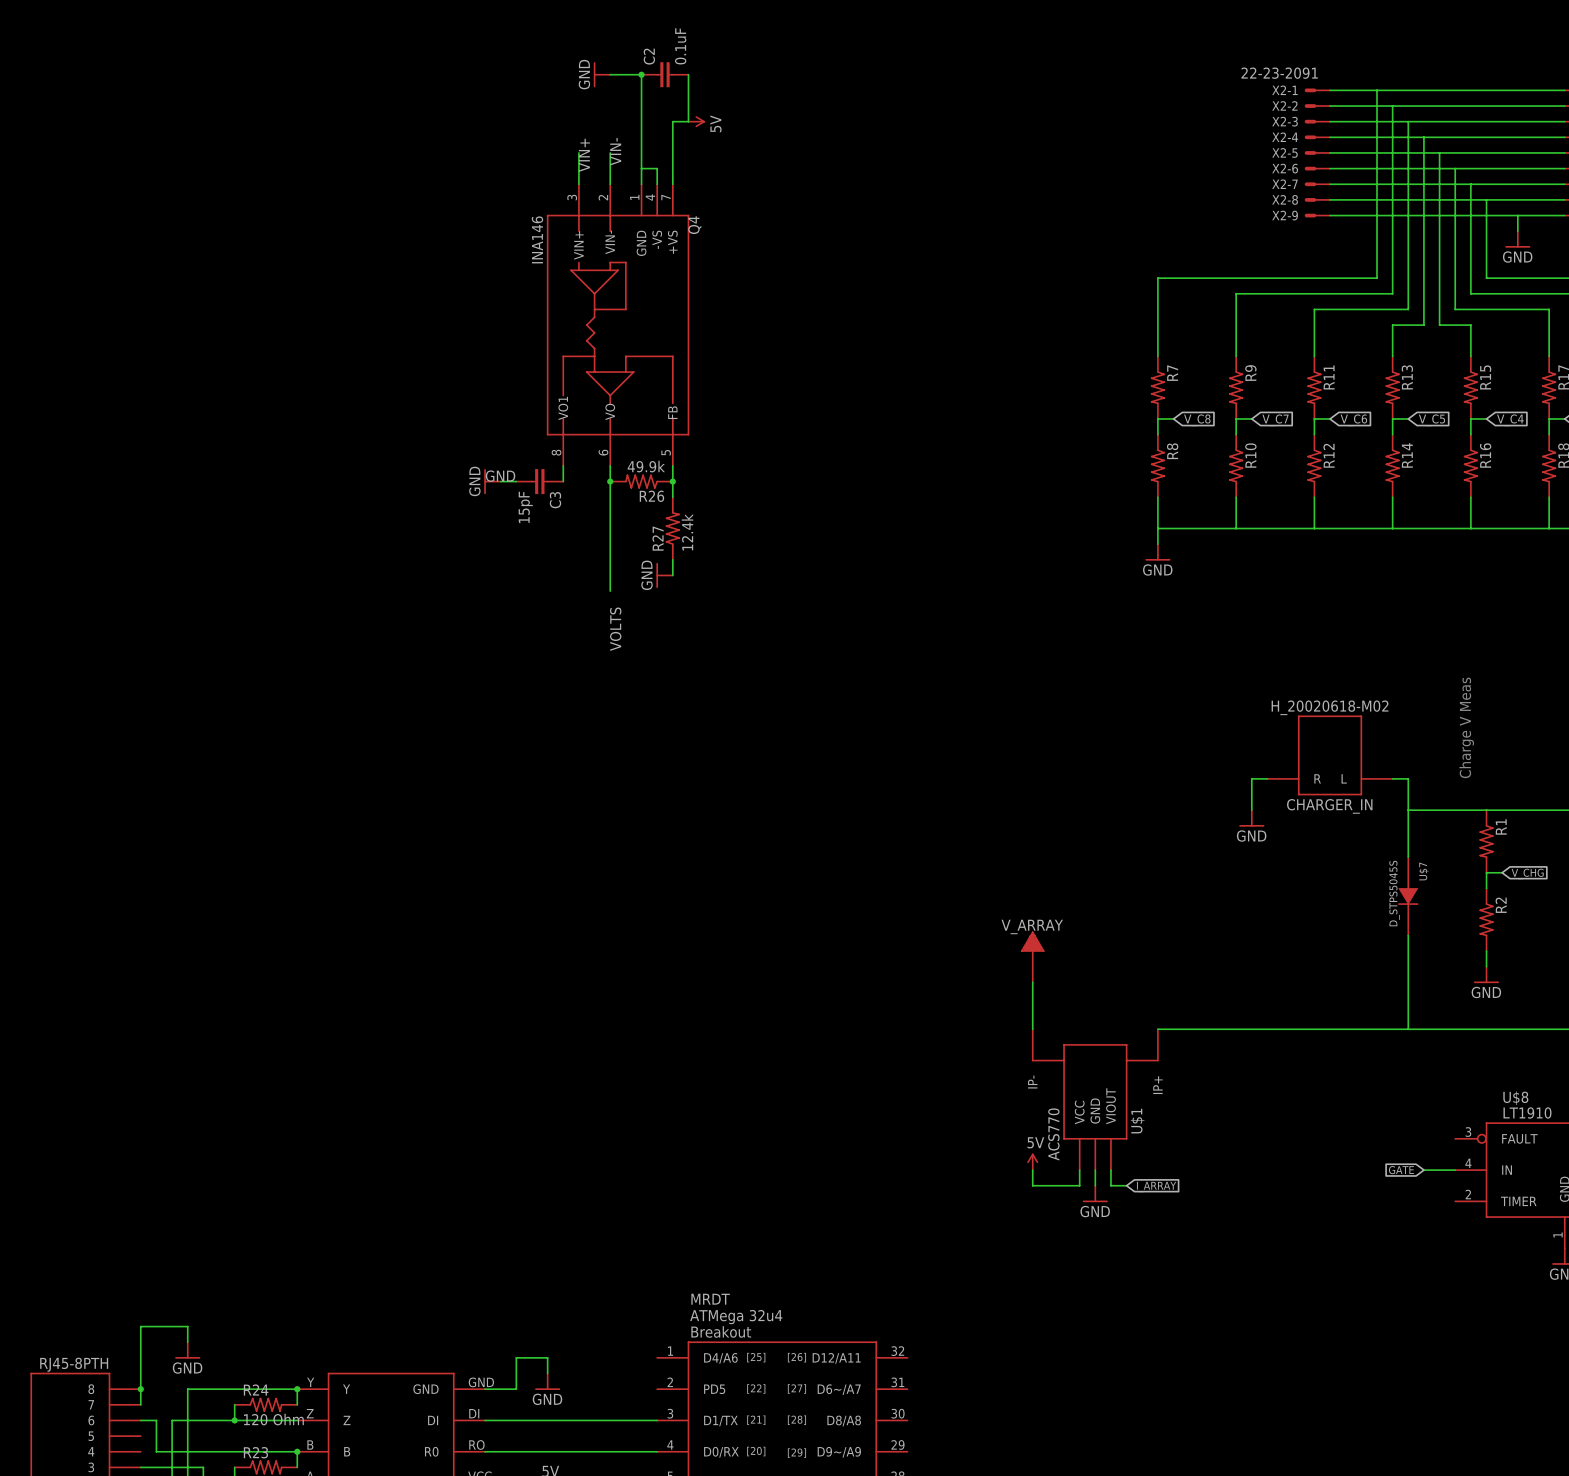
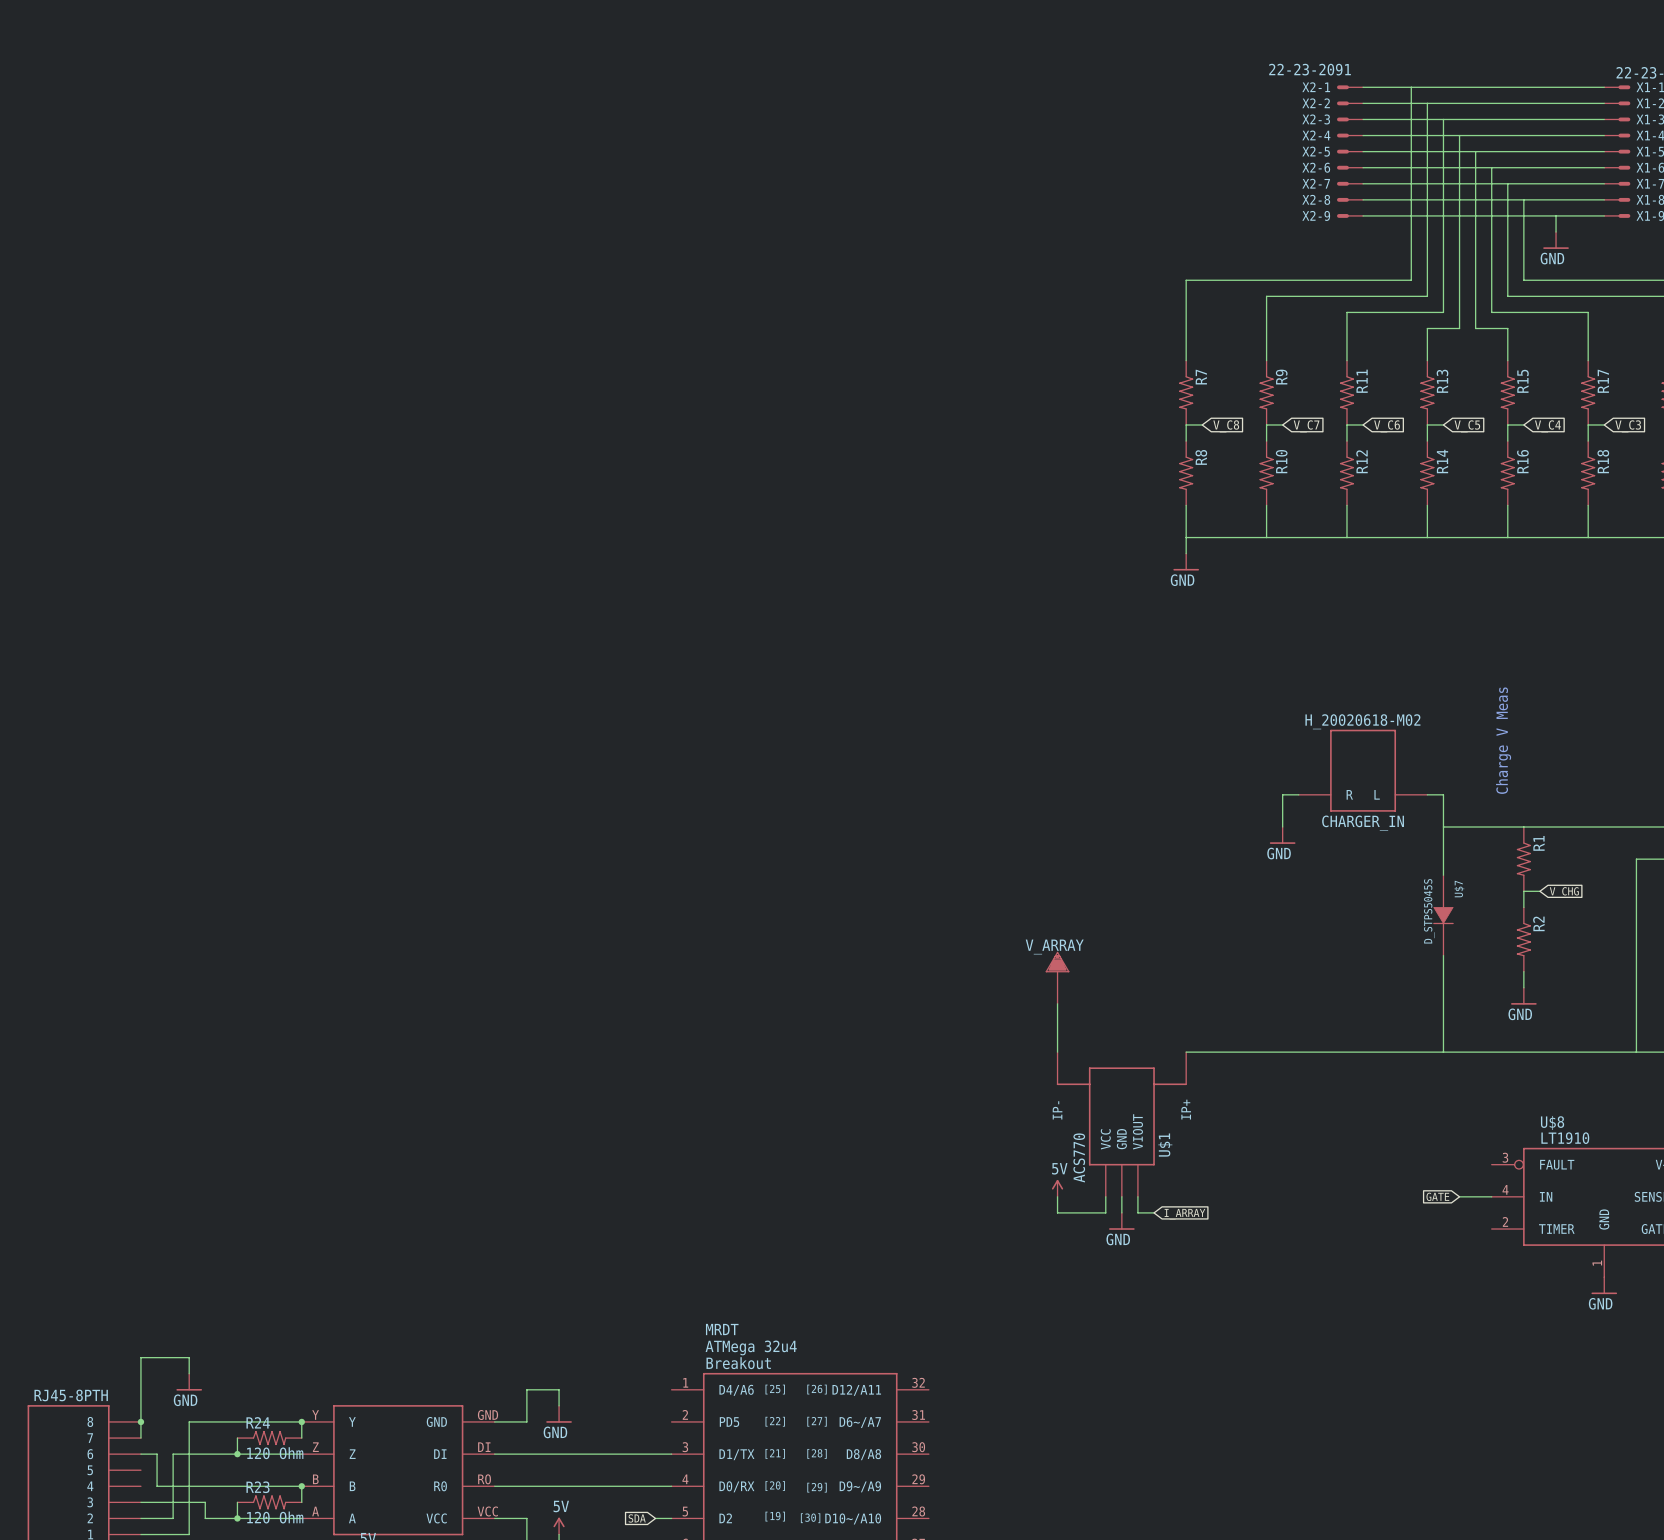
power symbol: GND (602, 74) -> none
wire: (610, 74) (641, 74) (641, 184) -> none
junction: (641, 74) -> none
C2: 0.1uF (665, 74) -> none
wire: (688, 74) (688, 121) (672, 121) (672, 184) -> none
power symbol: 5V (696, 121) -> none
label: VIN- (615, 151) -> none
wire: (578, 152) (578, 184) -> none
wire: (610, 152) (610, 184) -> none
label: VIN+ (584, 155) -> none
wire: (641, 168) (657, 168) (657, 184) -> none
Q4: INA146 (618, 325) -> none
wire: (563, 465) (563, 481) -> none
wire: (610, 465) (610, 591) -> none
wire: (672, 465) (672, 497) -> none
label: GND (500, 476) -> none
power symbol: GND (492, 481) -> none
wire: (500, 481) (516, 481) -> none
C3: 15pF (539, 481) -> none
junction: (610, 481) -> none
R26: 49.9k (641, 481) -> none
junction: (672, 481) -> none
R27: 12.4k (672, 528) -> none
wire: (672, 559) (672, 575) -> none
power symbol: GND (664, 575) -> none
label: VOLTS (615, 629) -> none

